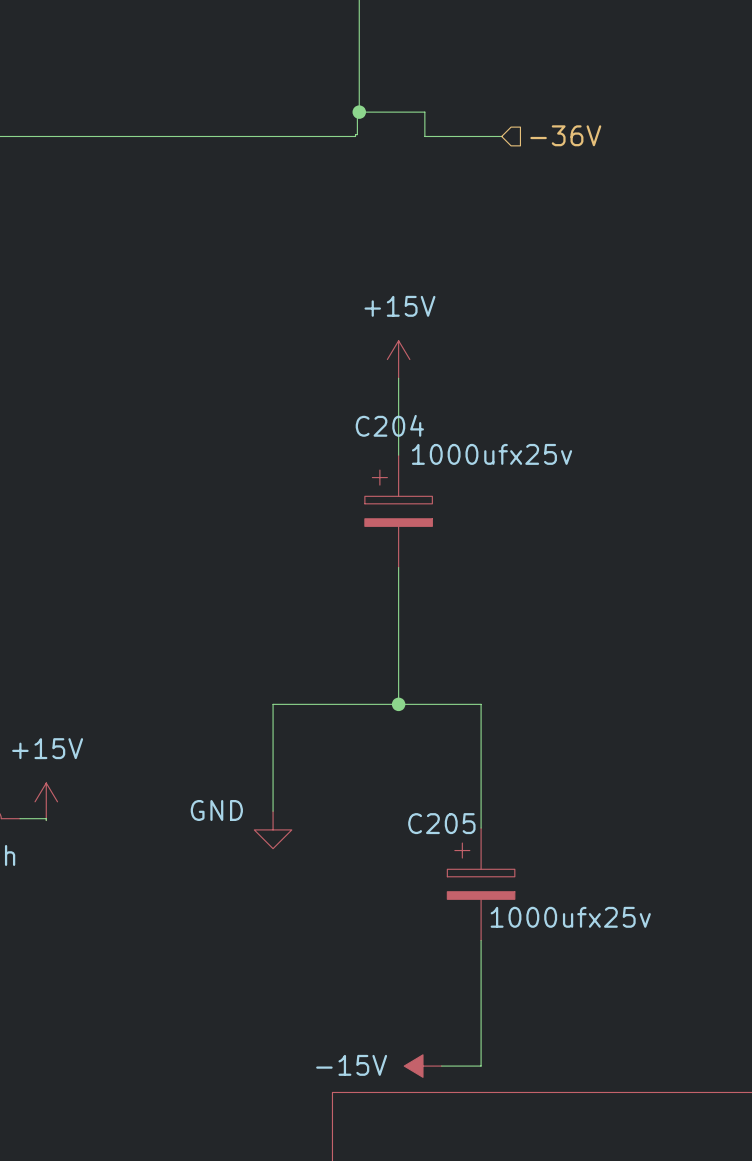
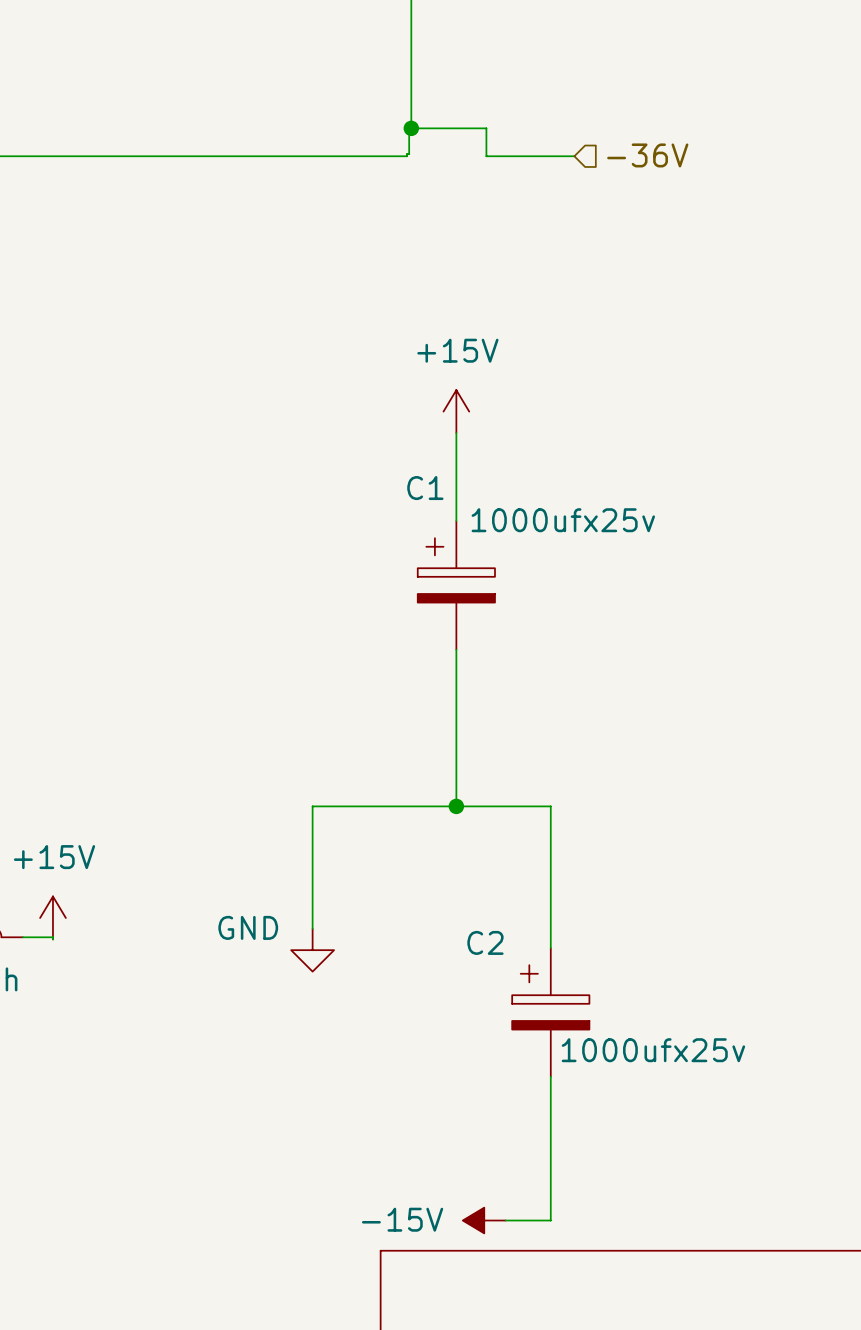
C204 name: C204 (389, 425) -> C1 (425, 488)
C205 name: C205 (441, 823) -> C2 (485, 942)

